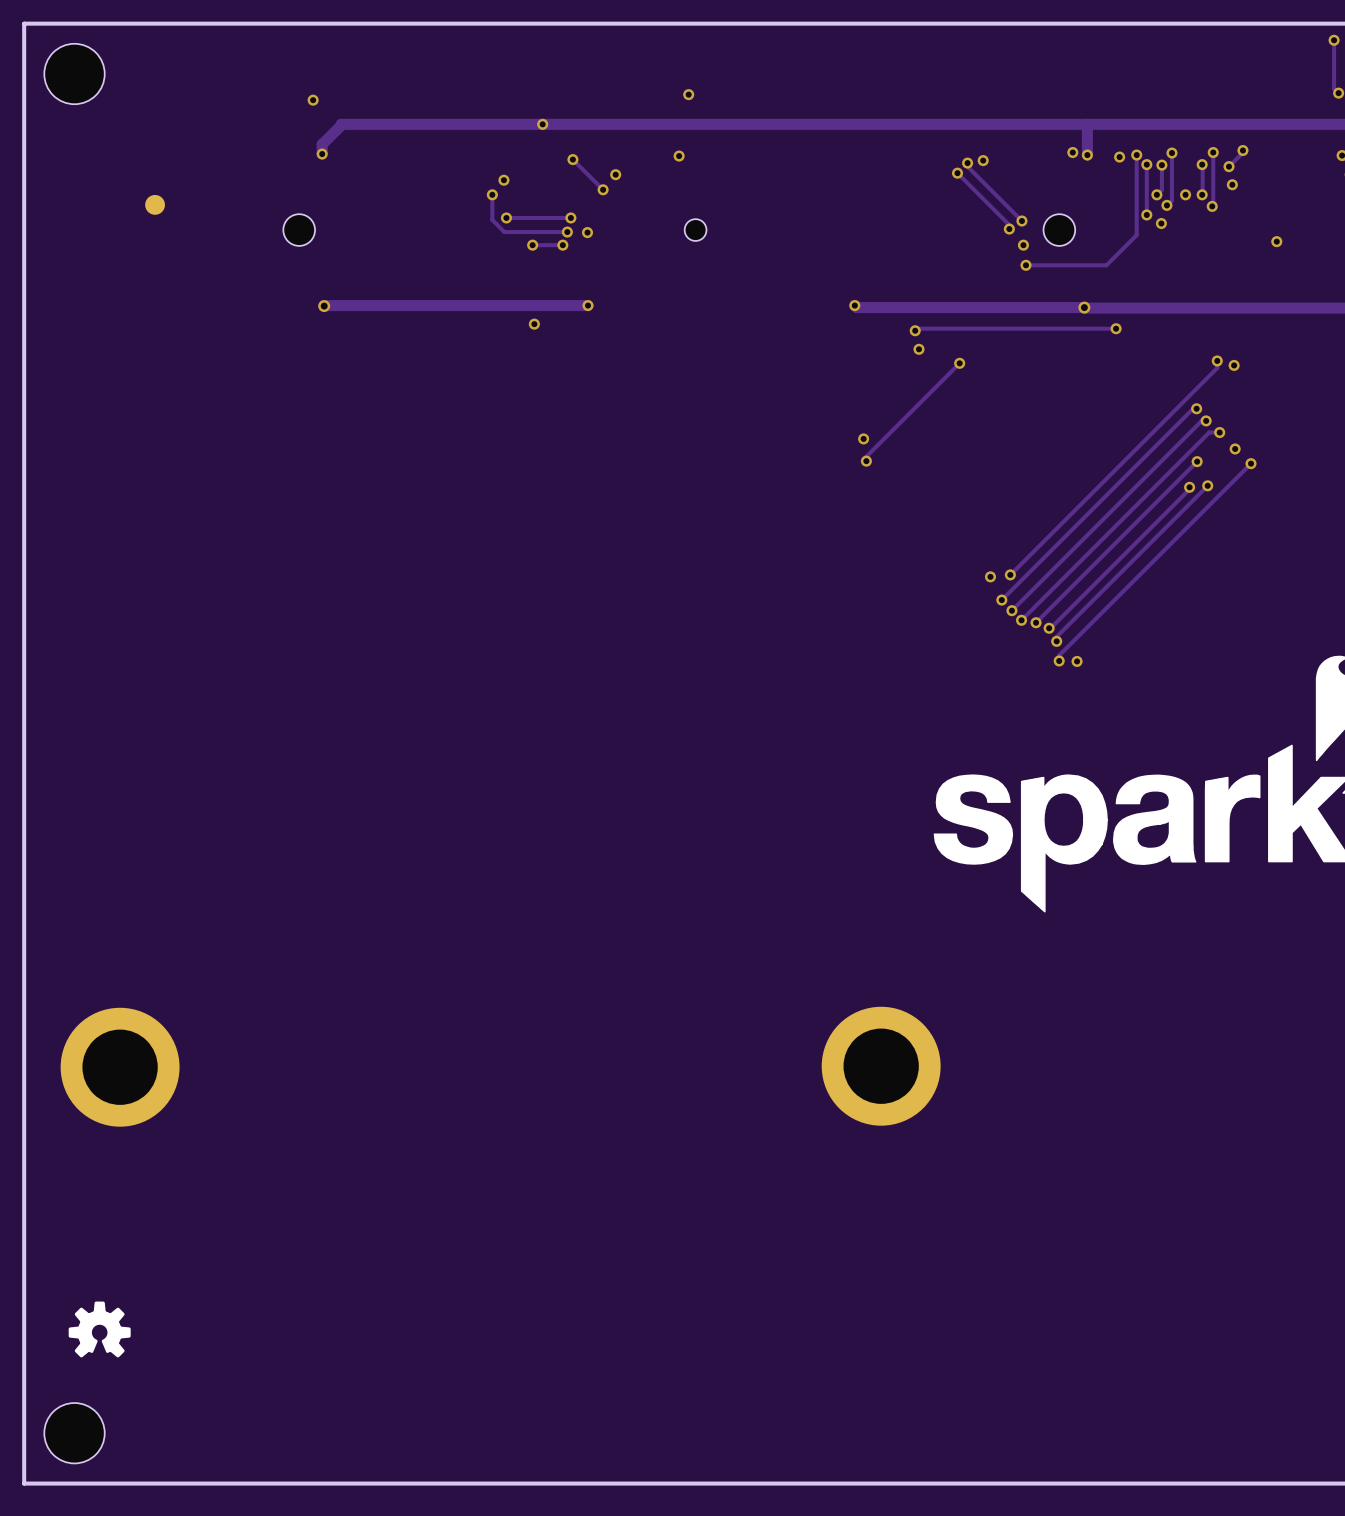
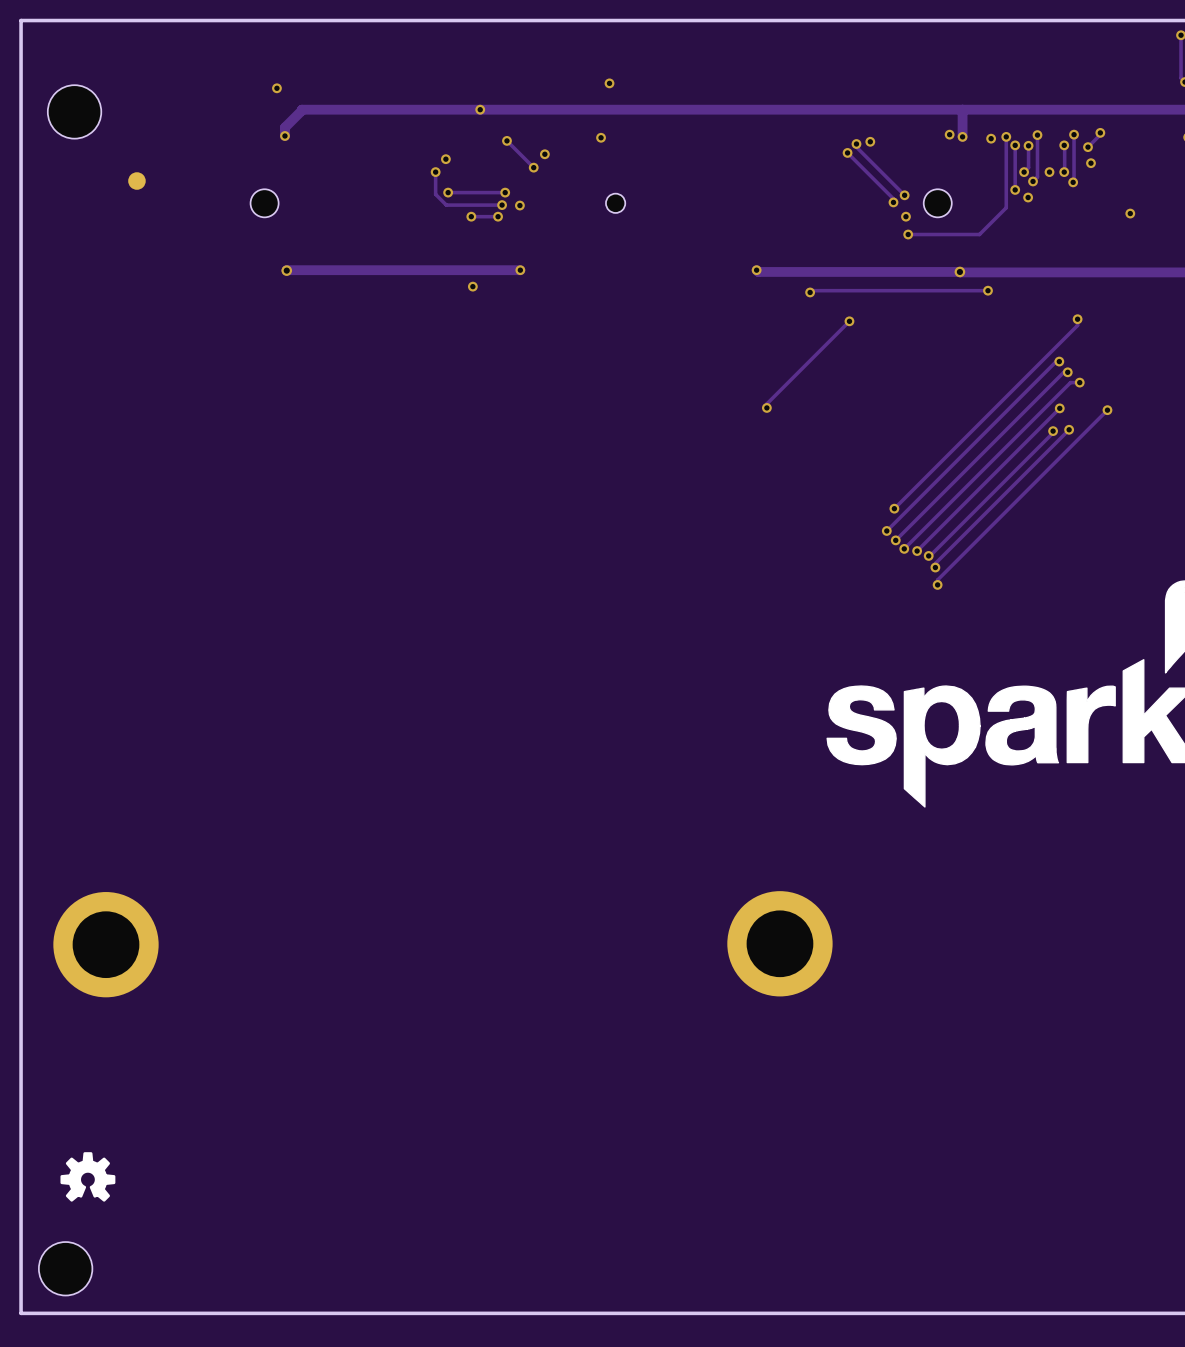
part position: (74, 73) -> (74, 111)
via: (918, 349) -> none
via: (1234, 365) -> none
via: (863, 438) -> none
via: (1235, 448) -> none
via: (990, 576) -> none
via: (1077, 661) -> none

